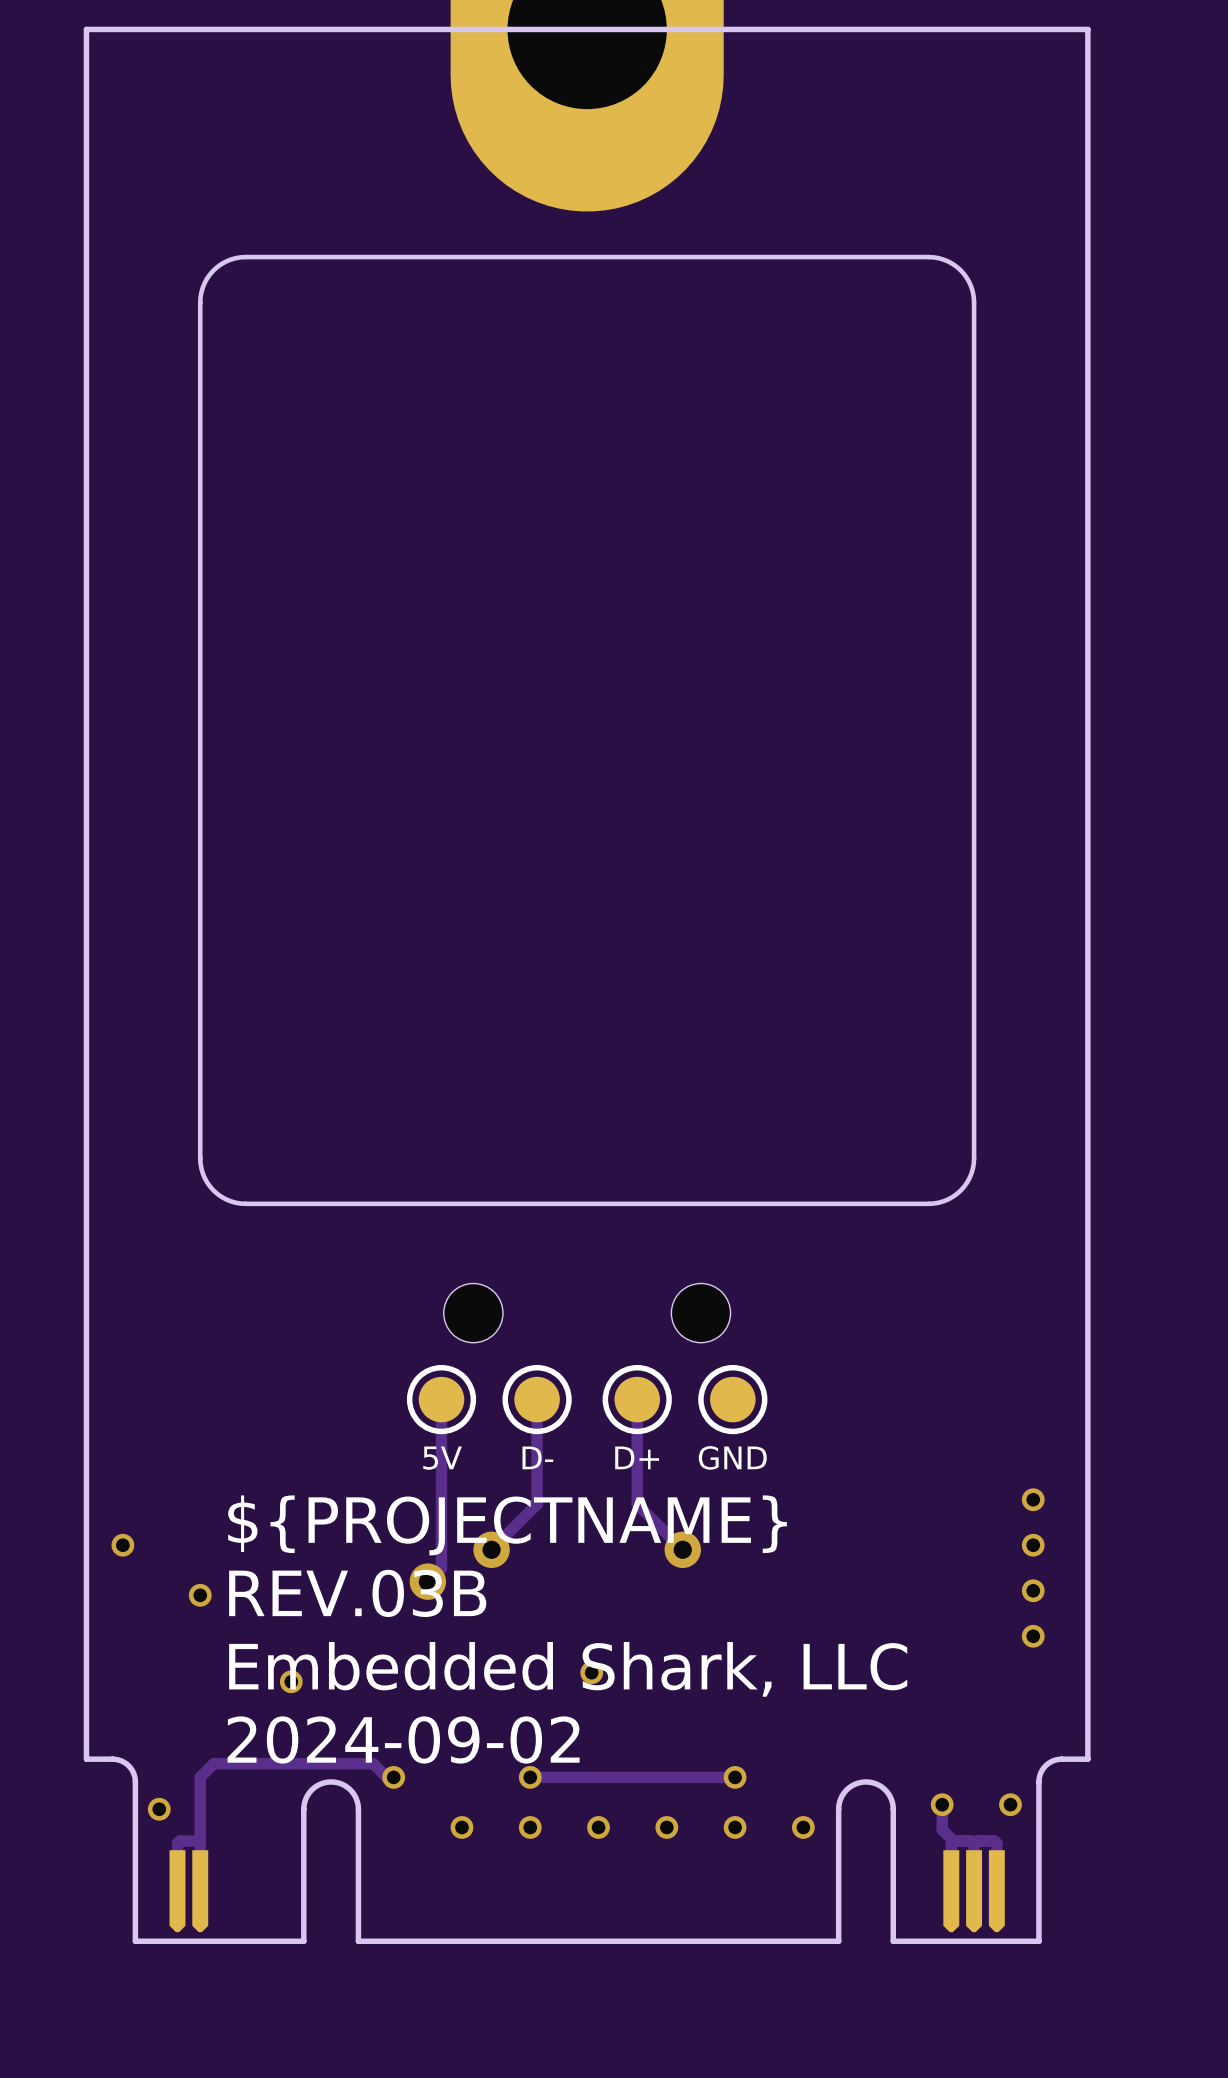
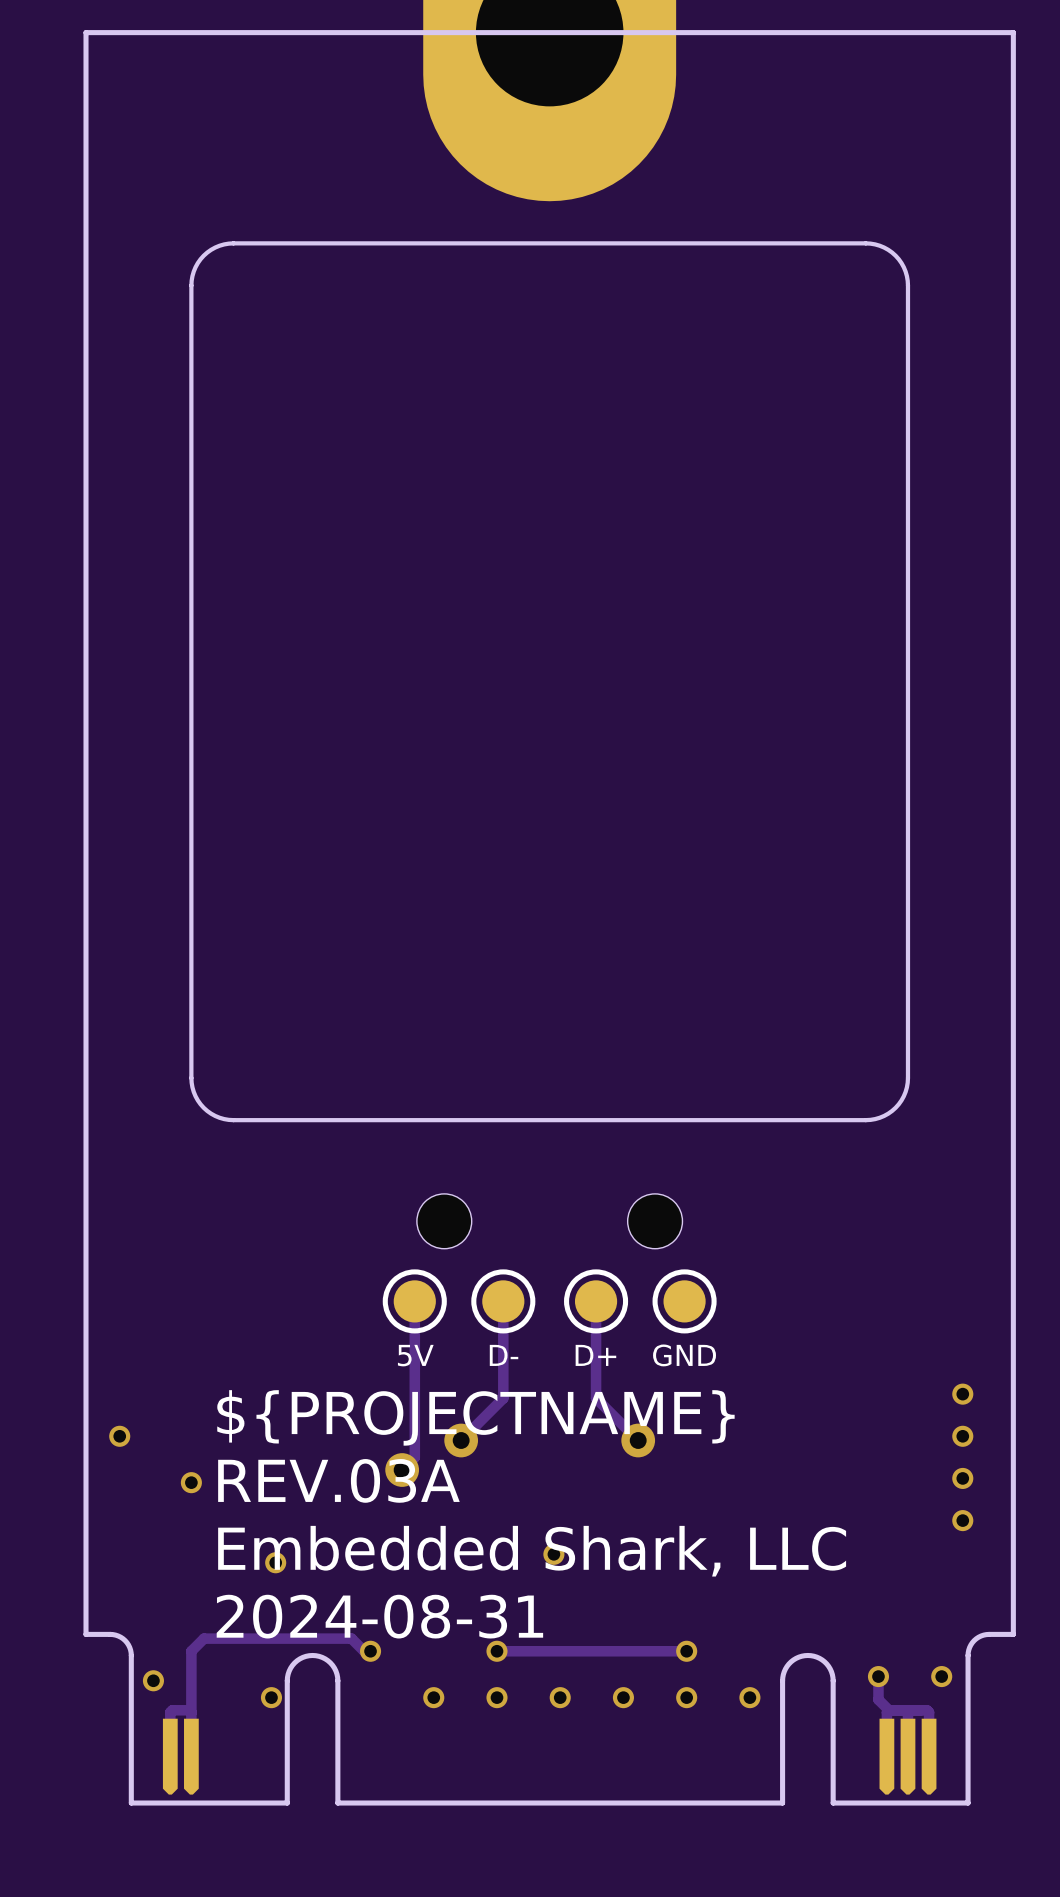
text: REV.03B (357, 1593) -> REV.03A (338, 1480)
text: 2024-09-02 (403, 1739) -> 2024-08-31 (379, 1616)
via: none -> (271, 1697)

